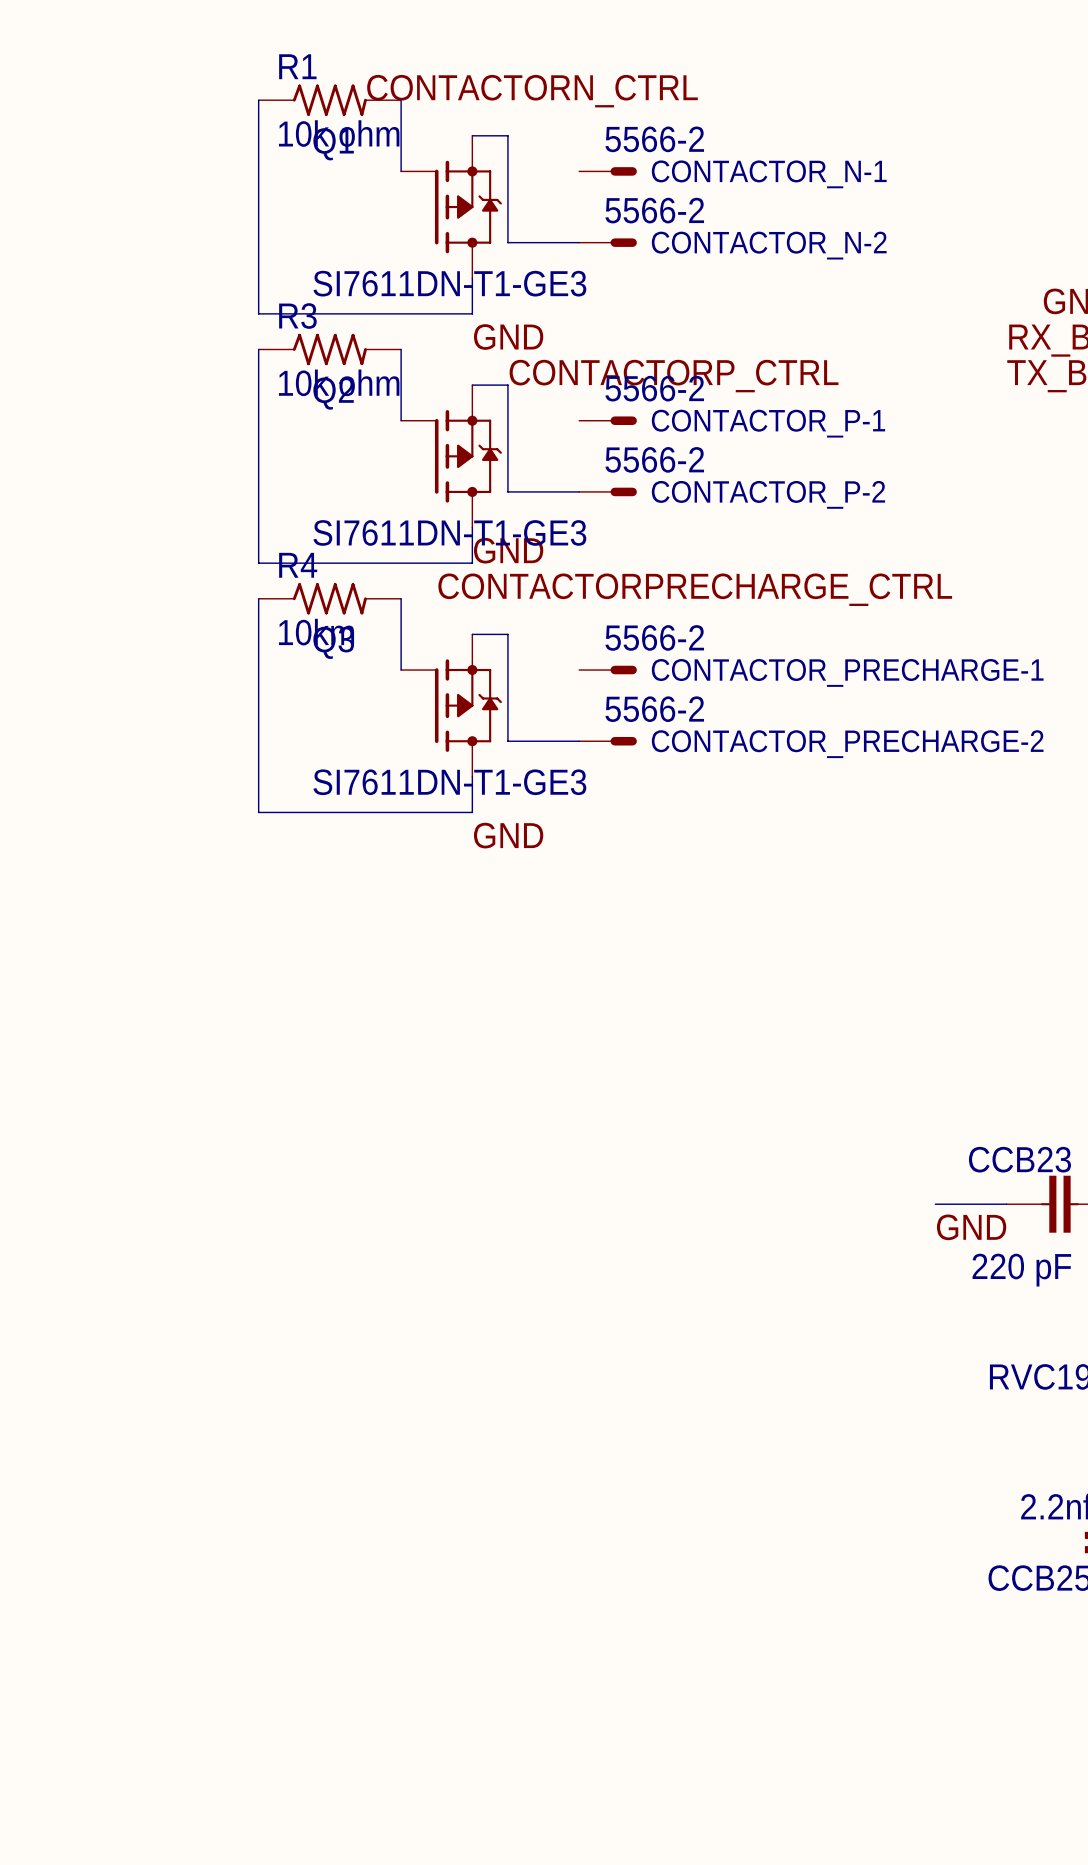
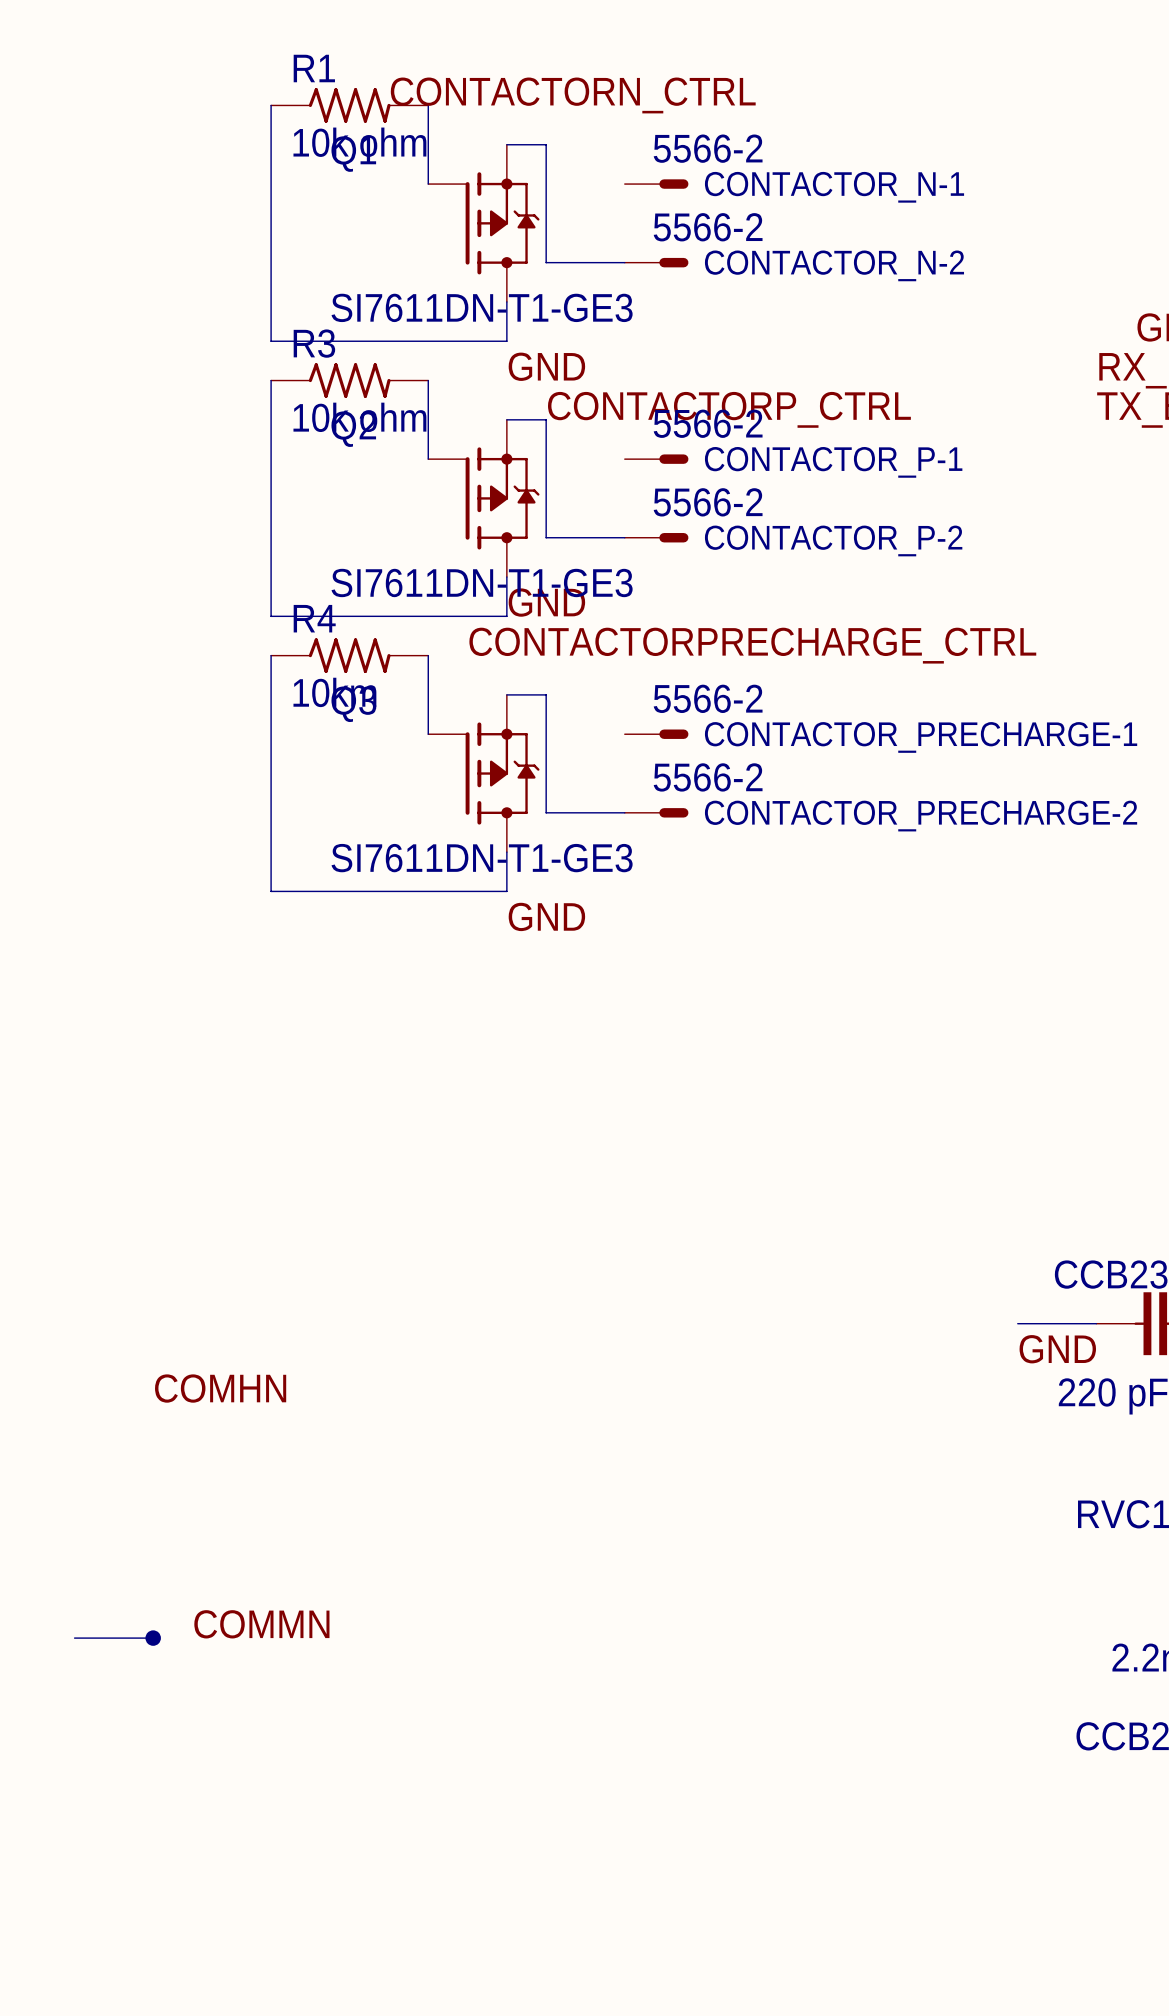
label: none -> COMHN (220, 1388)
label: none -> COMMN (261, 1624)
wire: none -> (74, 1638) (153, 1638)
junction: none -> (153, 1638)

